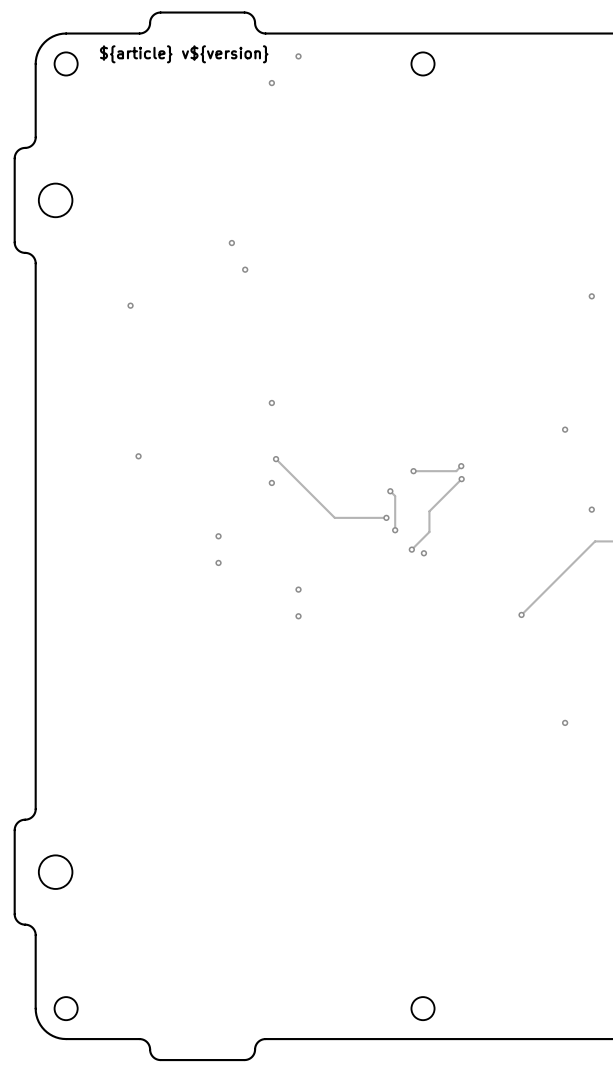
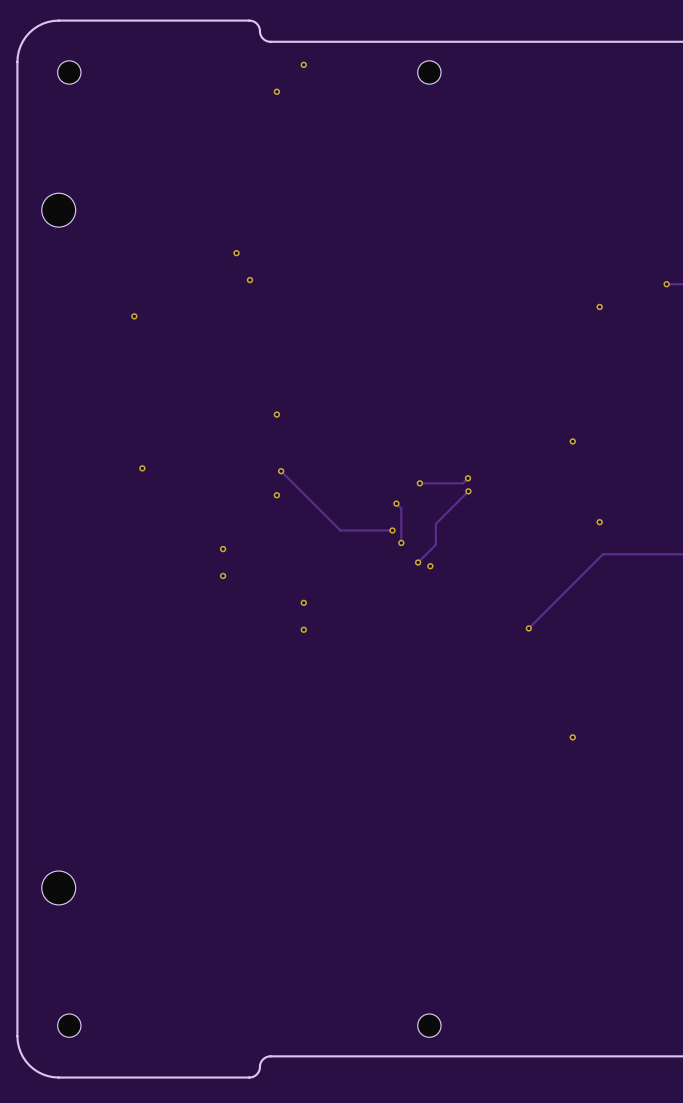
board edge: (160, 12) (153, 15) (148, 28) (141, 33) (62, 33) (52, 36) (44, 42) (38, 50) (35, 60) (35, 139) (30, 146) (17, 151) (14, 158) -> (164, 20) (53, 20) (38, 26) (29, 32) (22, 41) (17, 56) (17, 167)
text: ${article} v${version} (184, 54) -> none
board edge: (14, 242) (18, 250) (32, 255) (35, 263) (35, 809) (32, 816) (18, 821) (14, 830) -> (17, 252) (17, 845)
board edge: (14, 914) (17, 921) (30, 926) (35, 932) (35, 1012) (38, 1021) (44, 1030) (52, 1036) (62, 1038) (141, 1039) (148, 1043) (153, 1056) (160, 1060) -> (17, 930) (17, 1041) (22, 1056) (29, 1065) (42, 1074) (53, 1077) (164, 1077)

